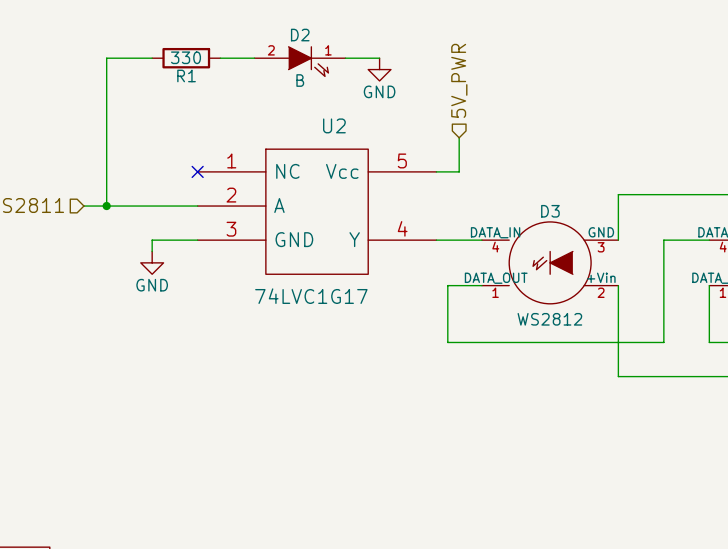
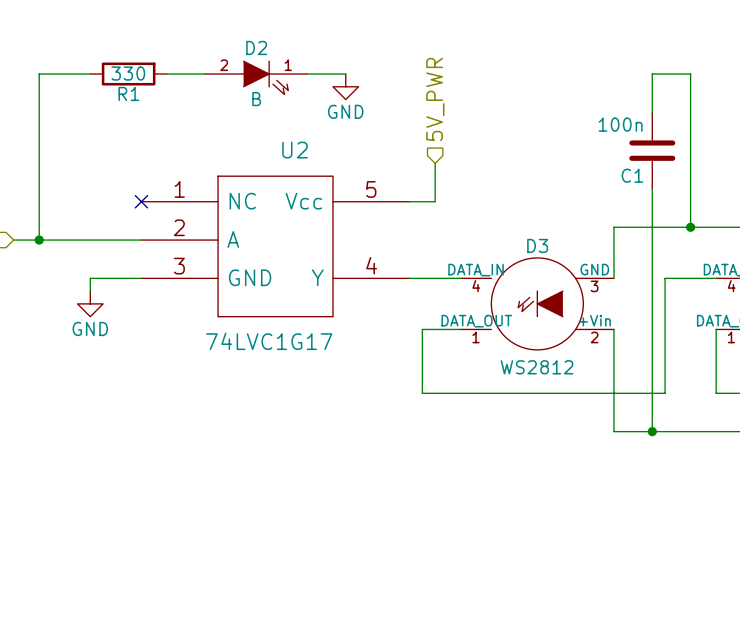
wire: none -> (652, 112) (652, 74) (690, 74) (690, 227)
C1: none -> 100n (652, 150)
wire: none -> (652, 188) (652, 431)
junction: none -> (690, 227)
junction: none -> (652, 431)

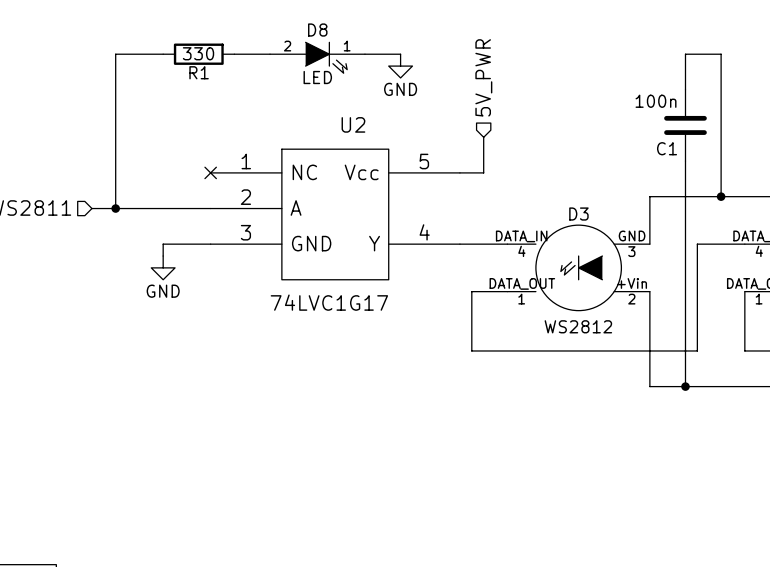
D2 name: D2 (256, 47) -> D8 (317, 30)
D2 value: B (256, 99) -> LED (317, 77)

